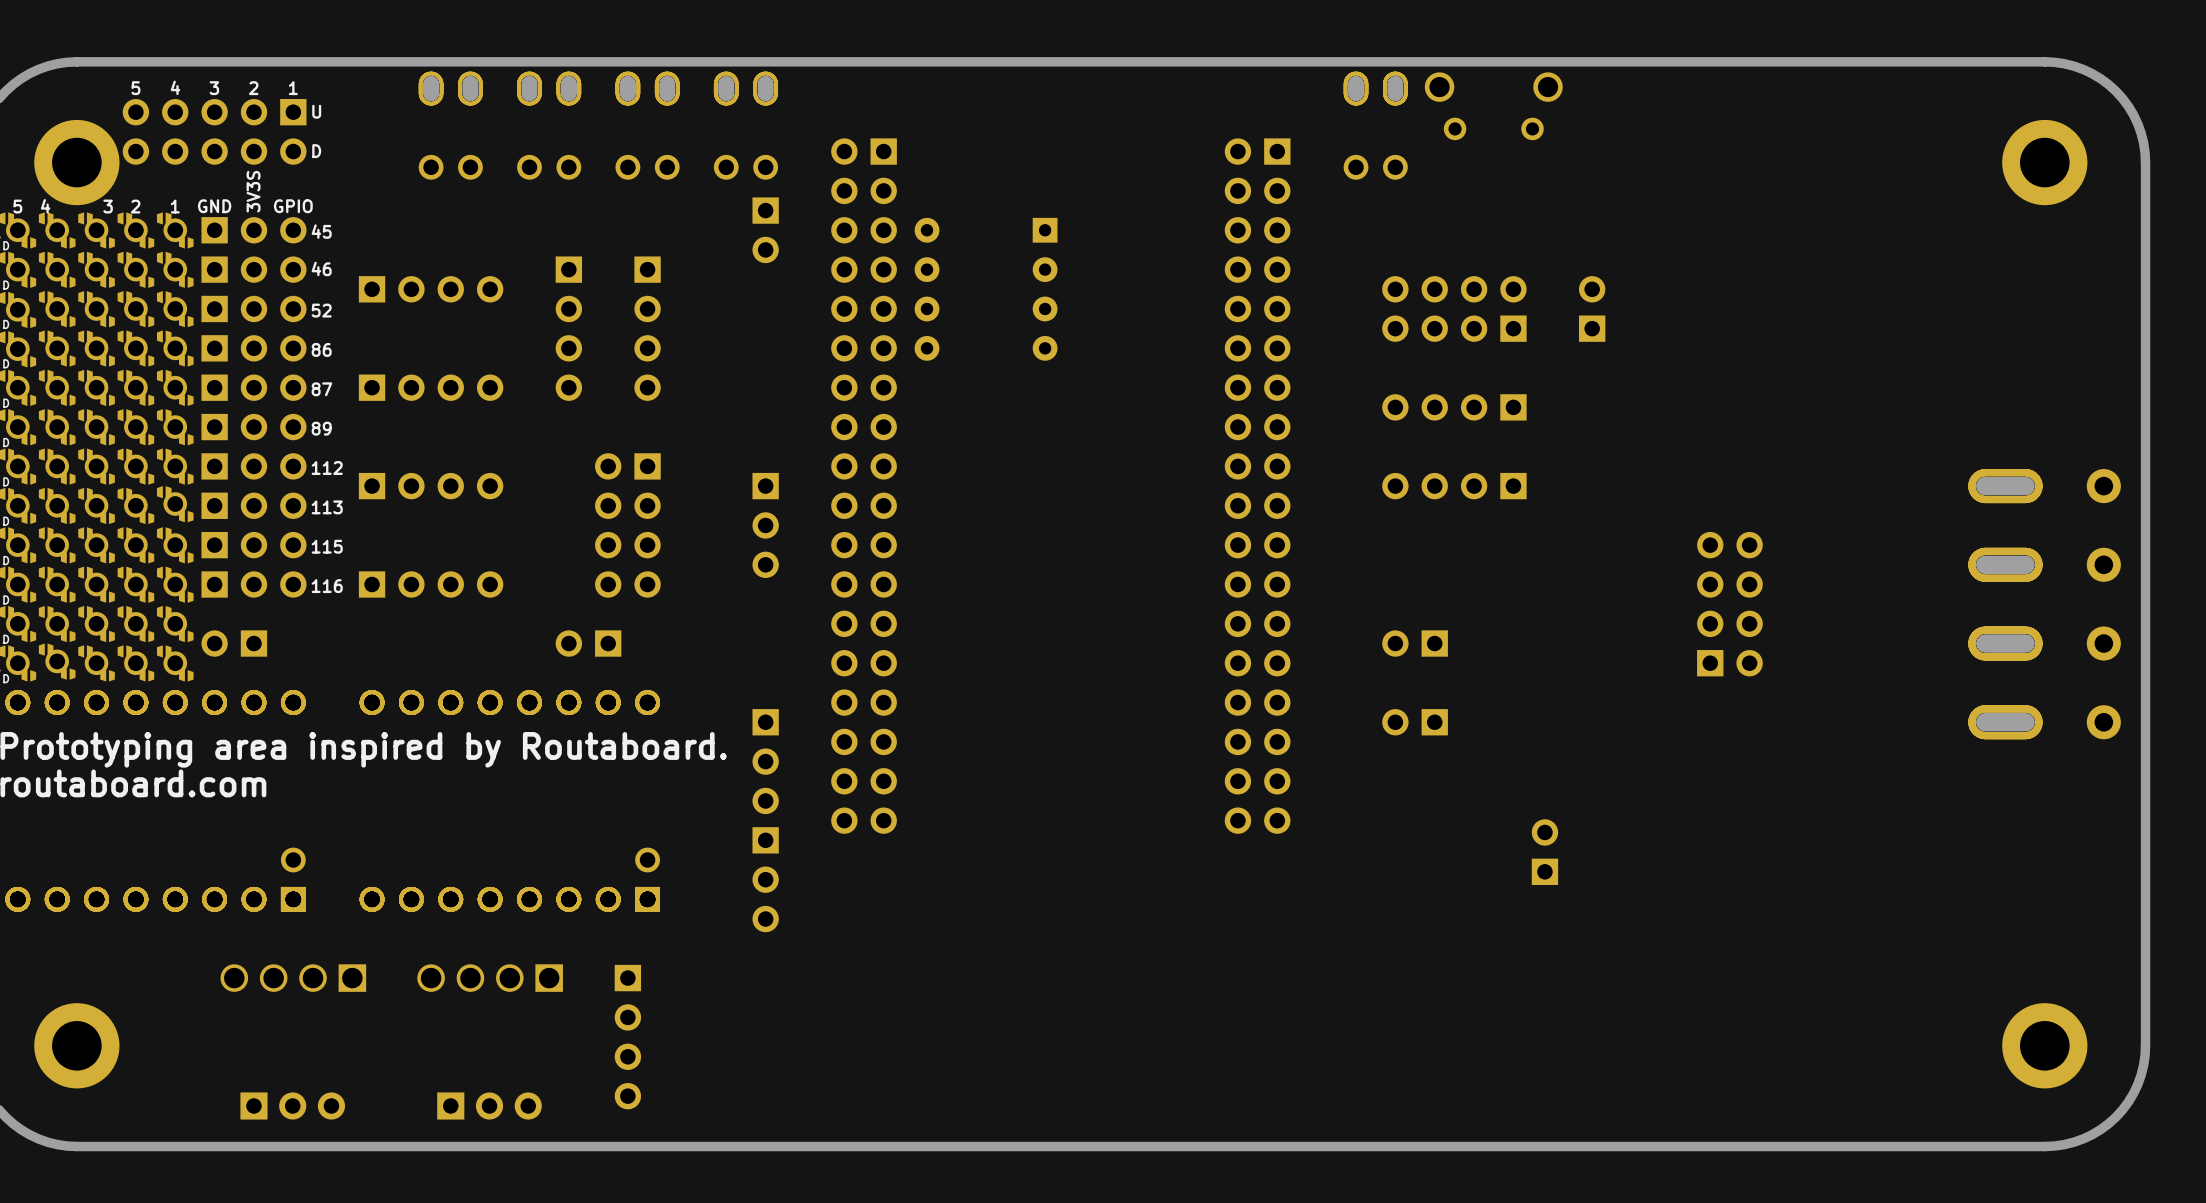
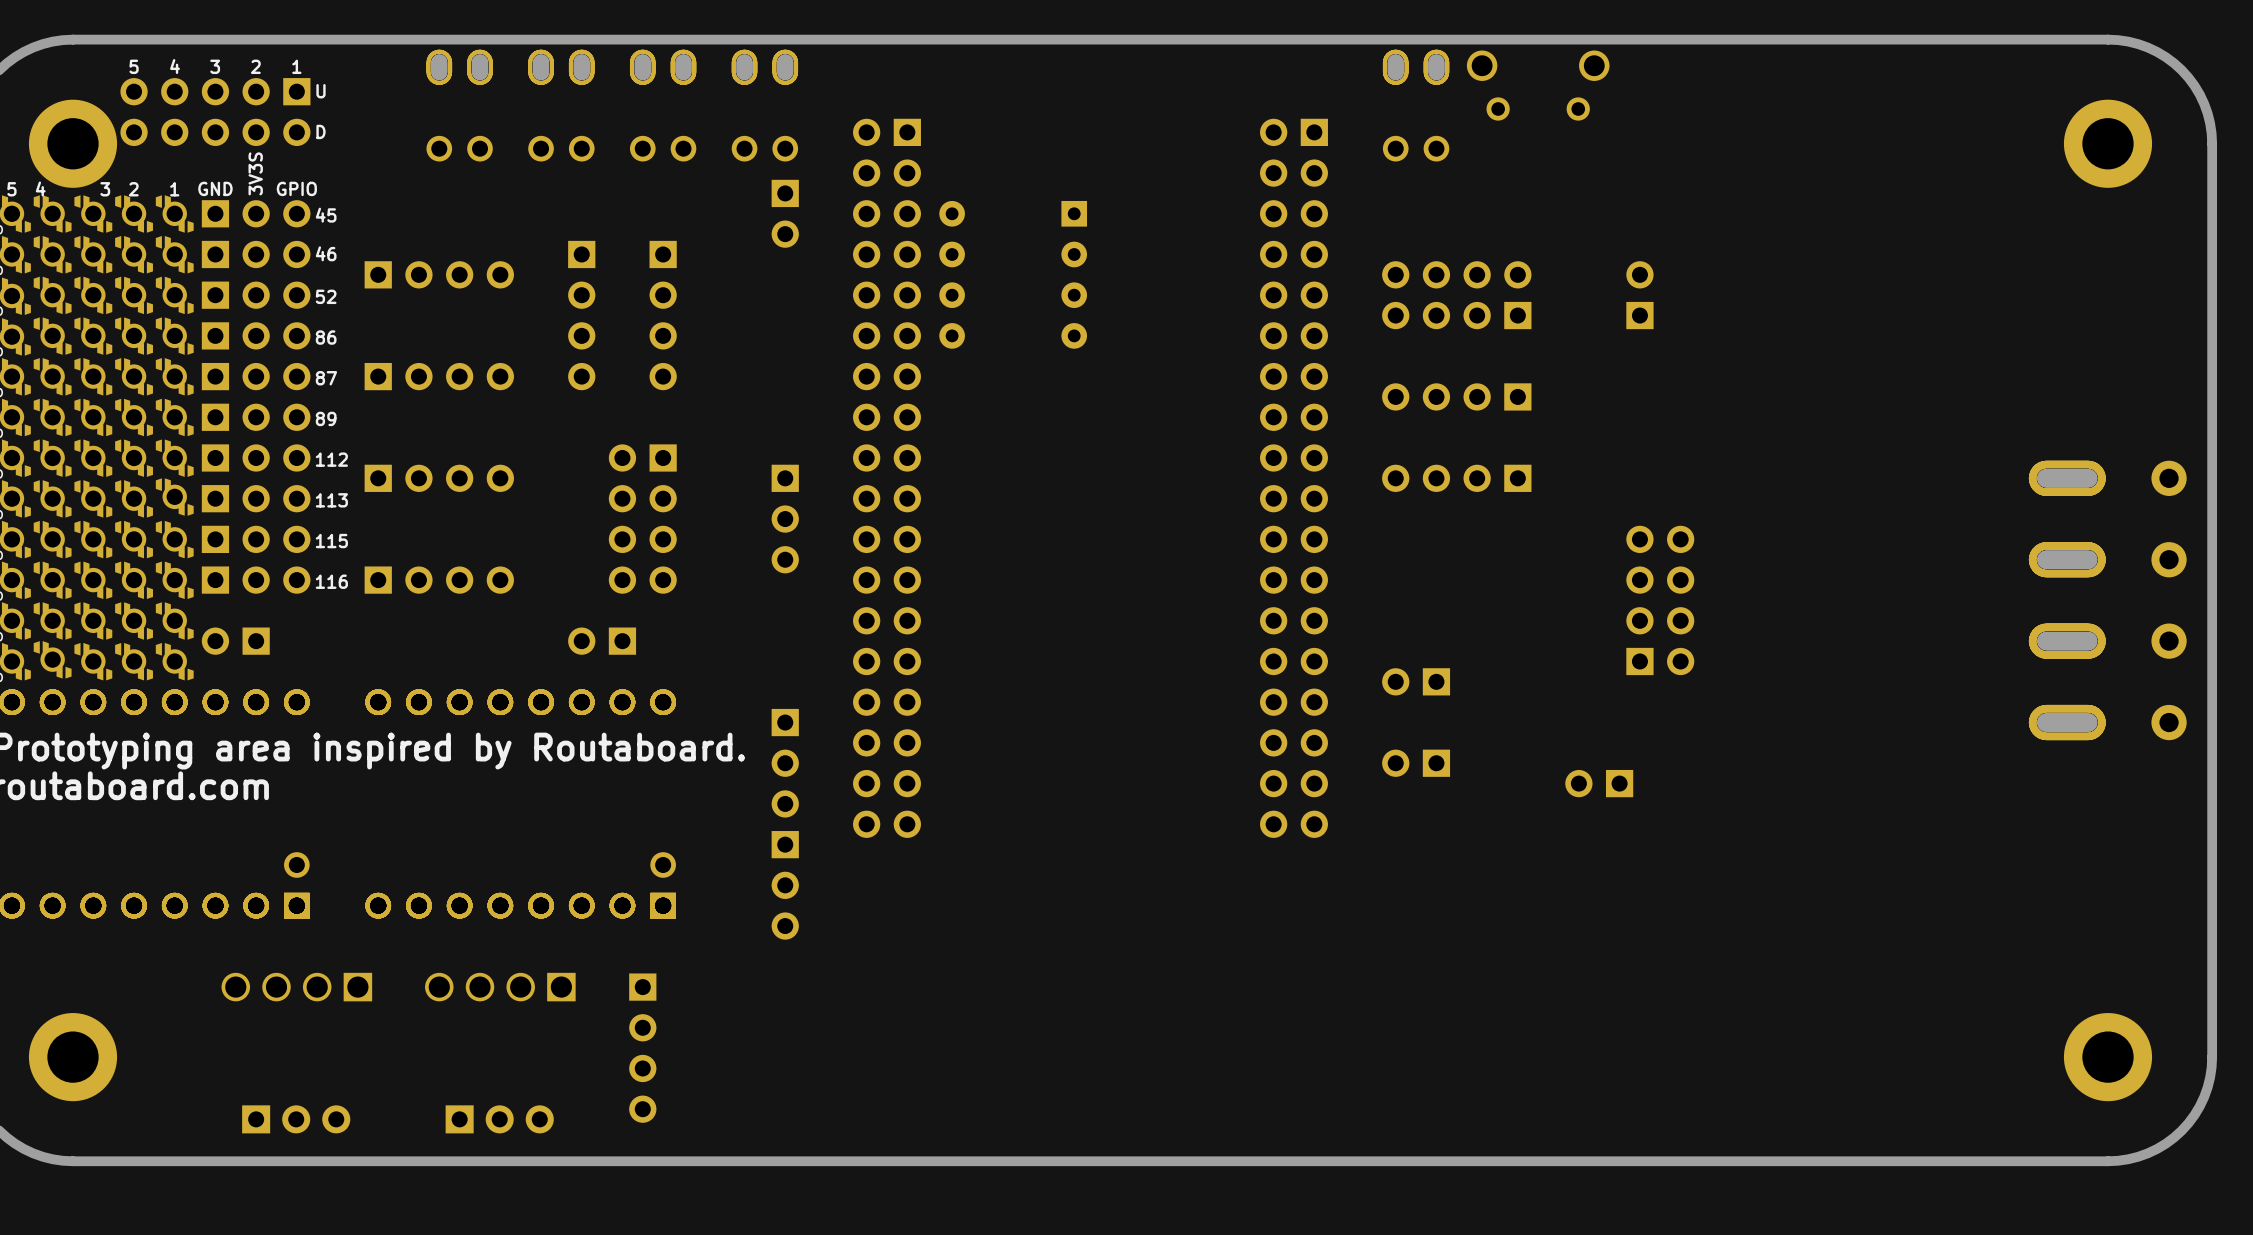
part position: (1454, 308) -> (1456, 295)
part position: (1454, 407) -> (1456, 396)
part position: (1454, 486) -> (1456, 478)
part position: (1729, 604) -> (1660, 600)
part: (1415, 643) -> none
part: none -> (1416, 681)
part: (1415, 722) -> none
part: none -> (1416, 763)
part rotation: 0° (1544, 852) -> 90° counterclockwise (1599, 783)
part position: (1544, 852) -> (1599, 783)

